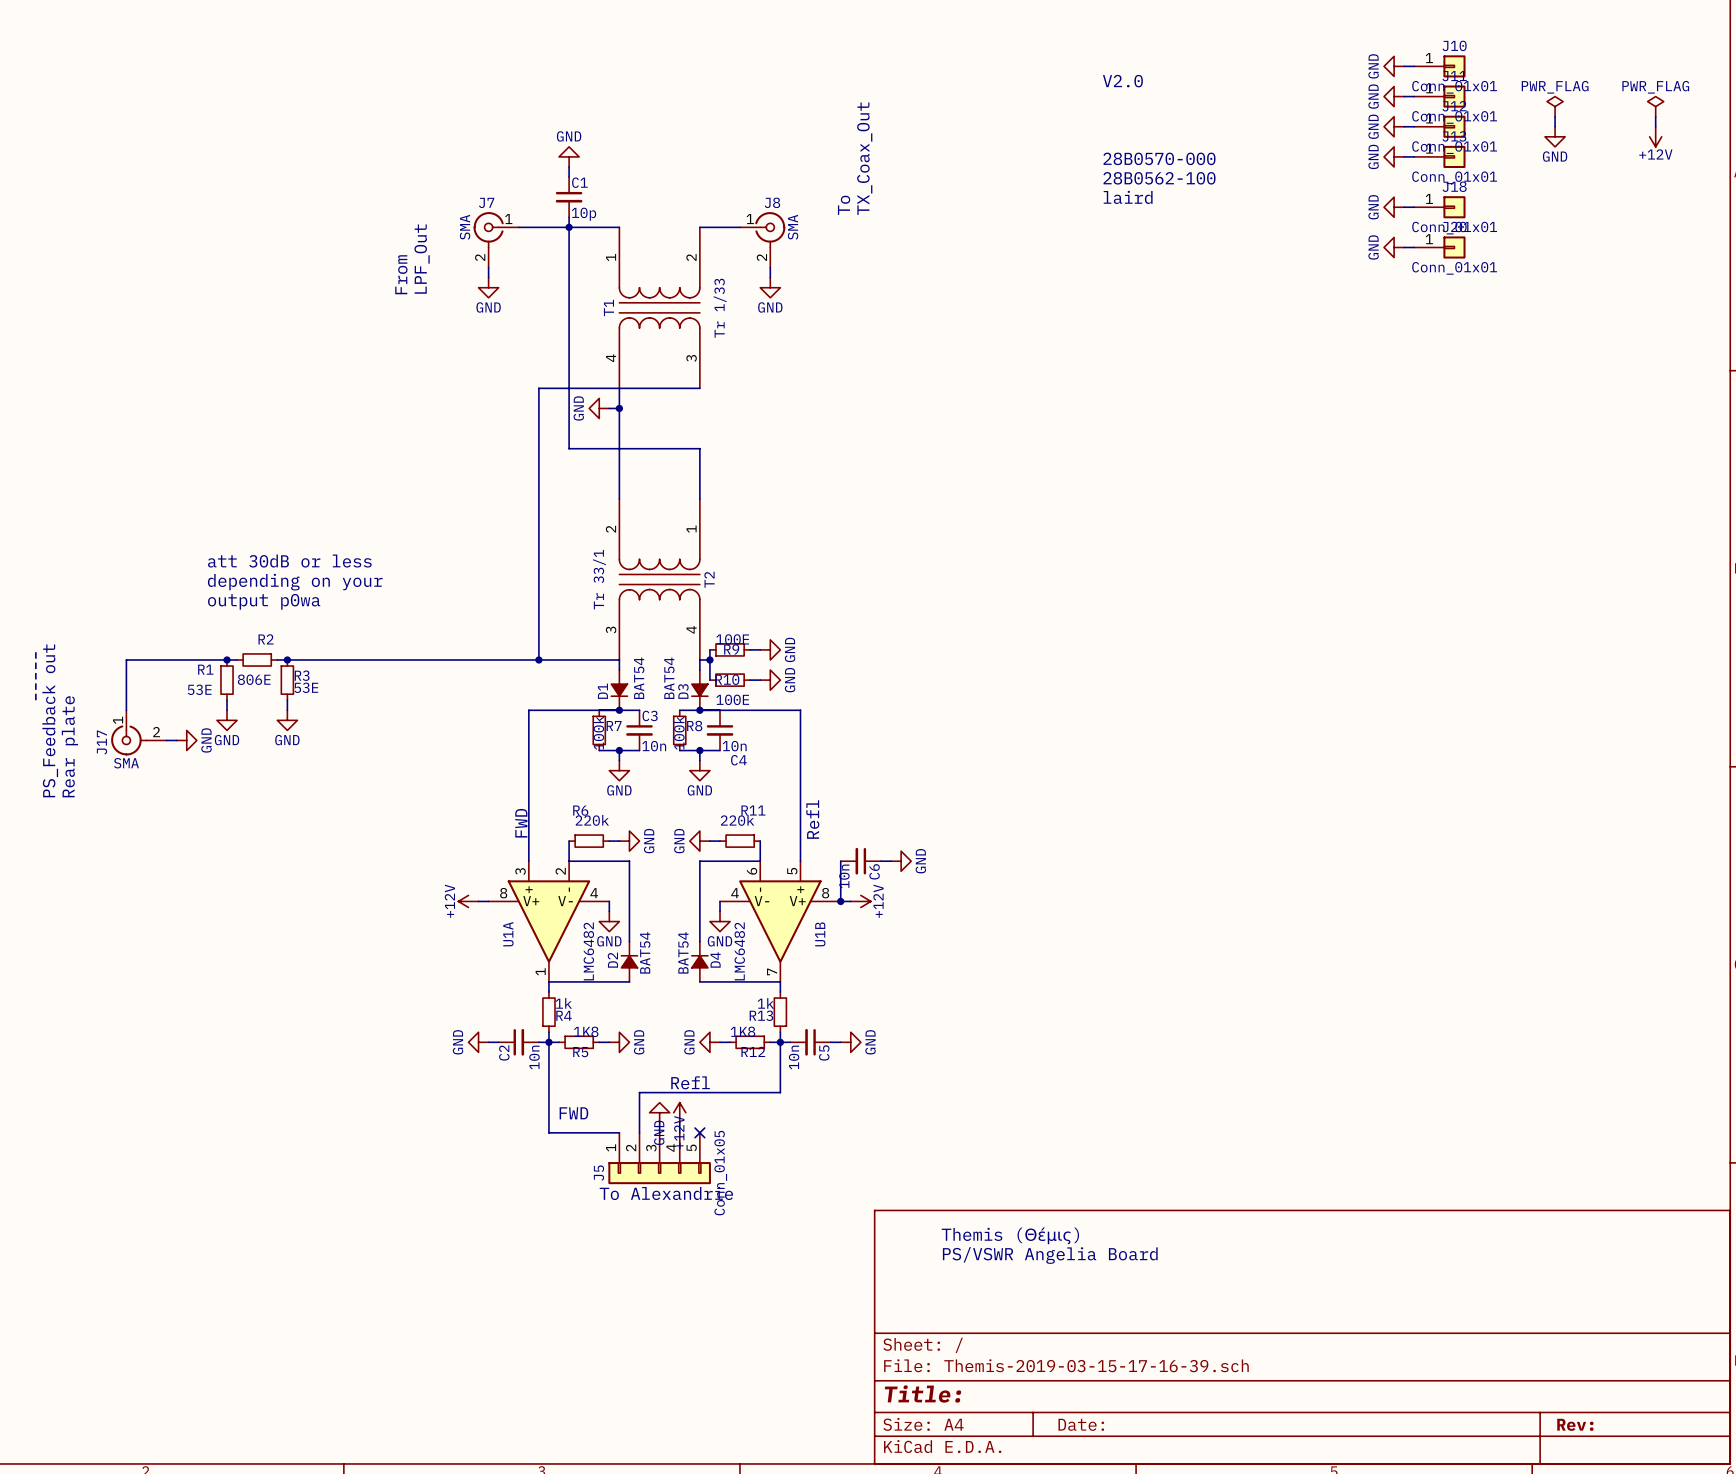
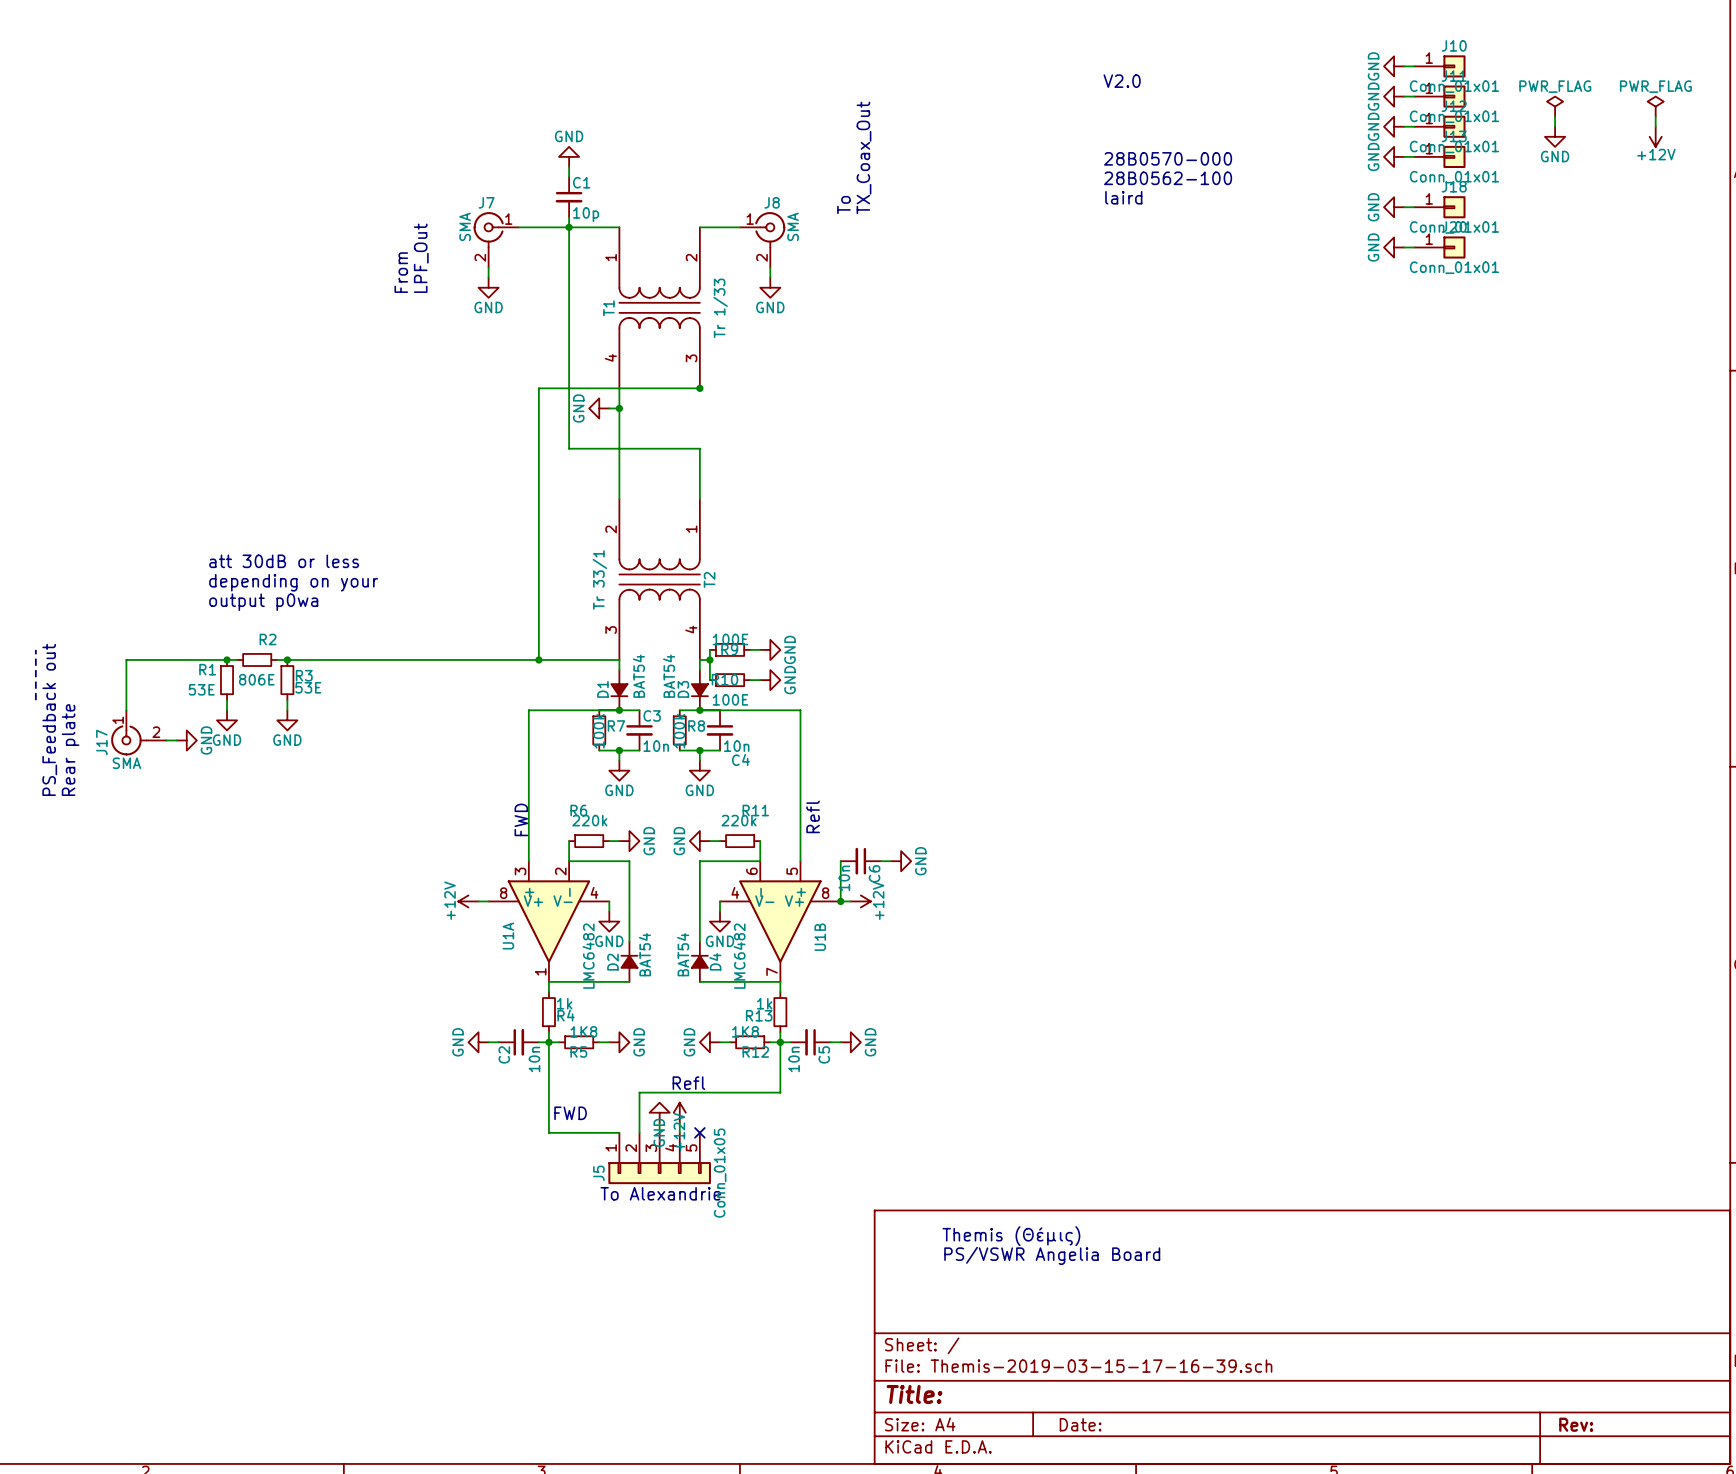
junction: none -> (699, 388)

